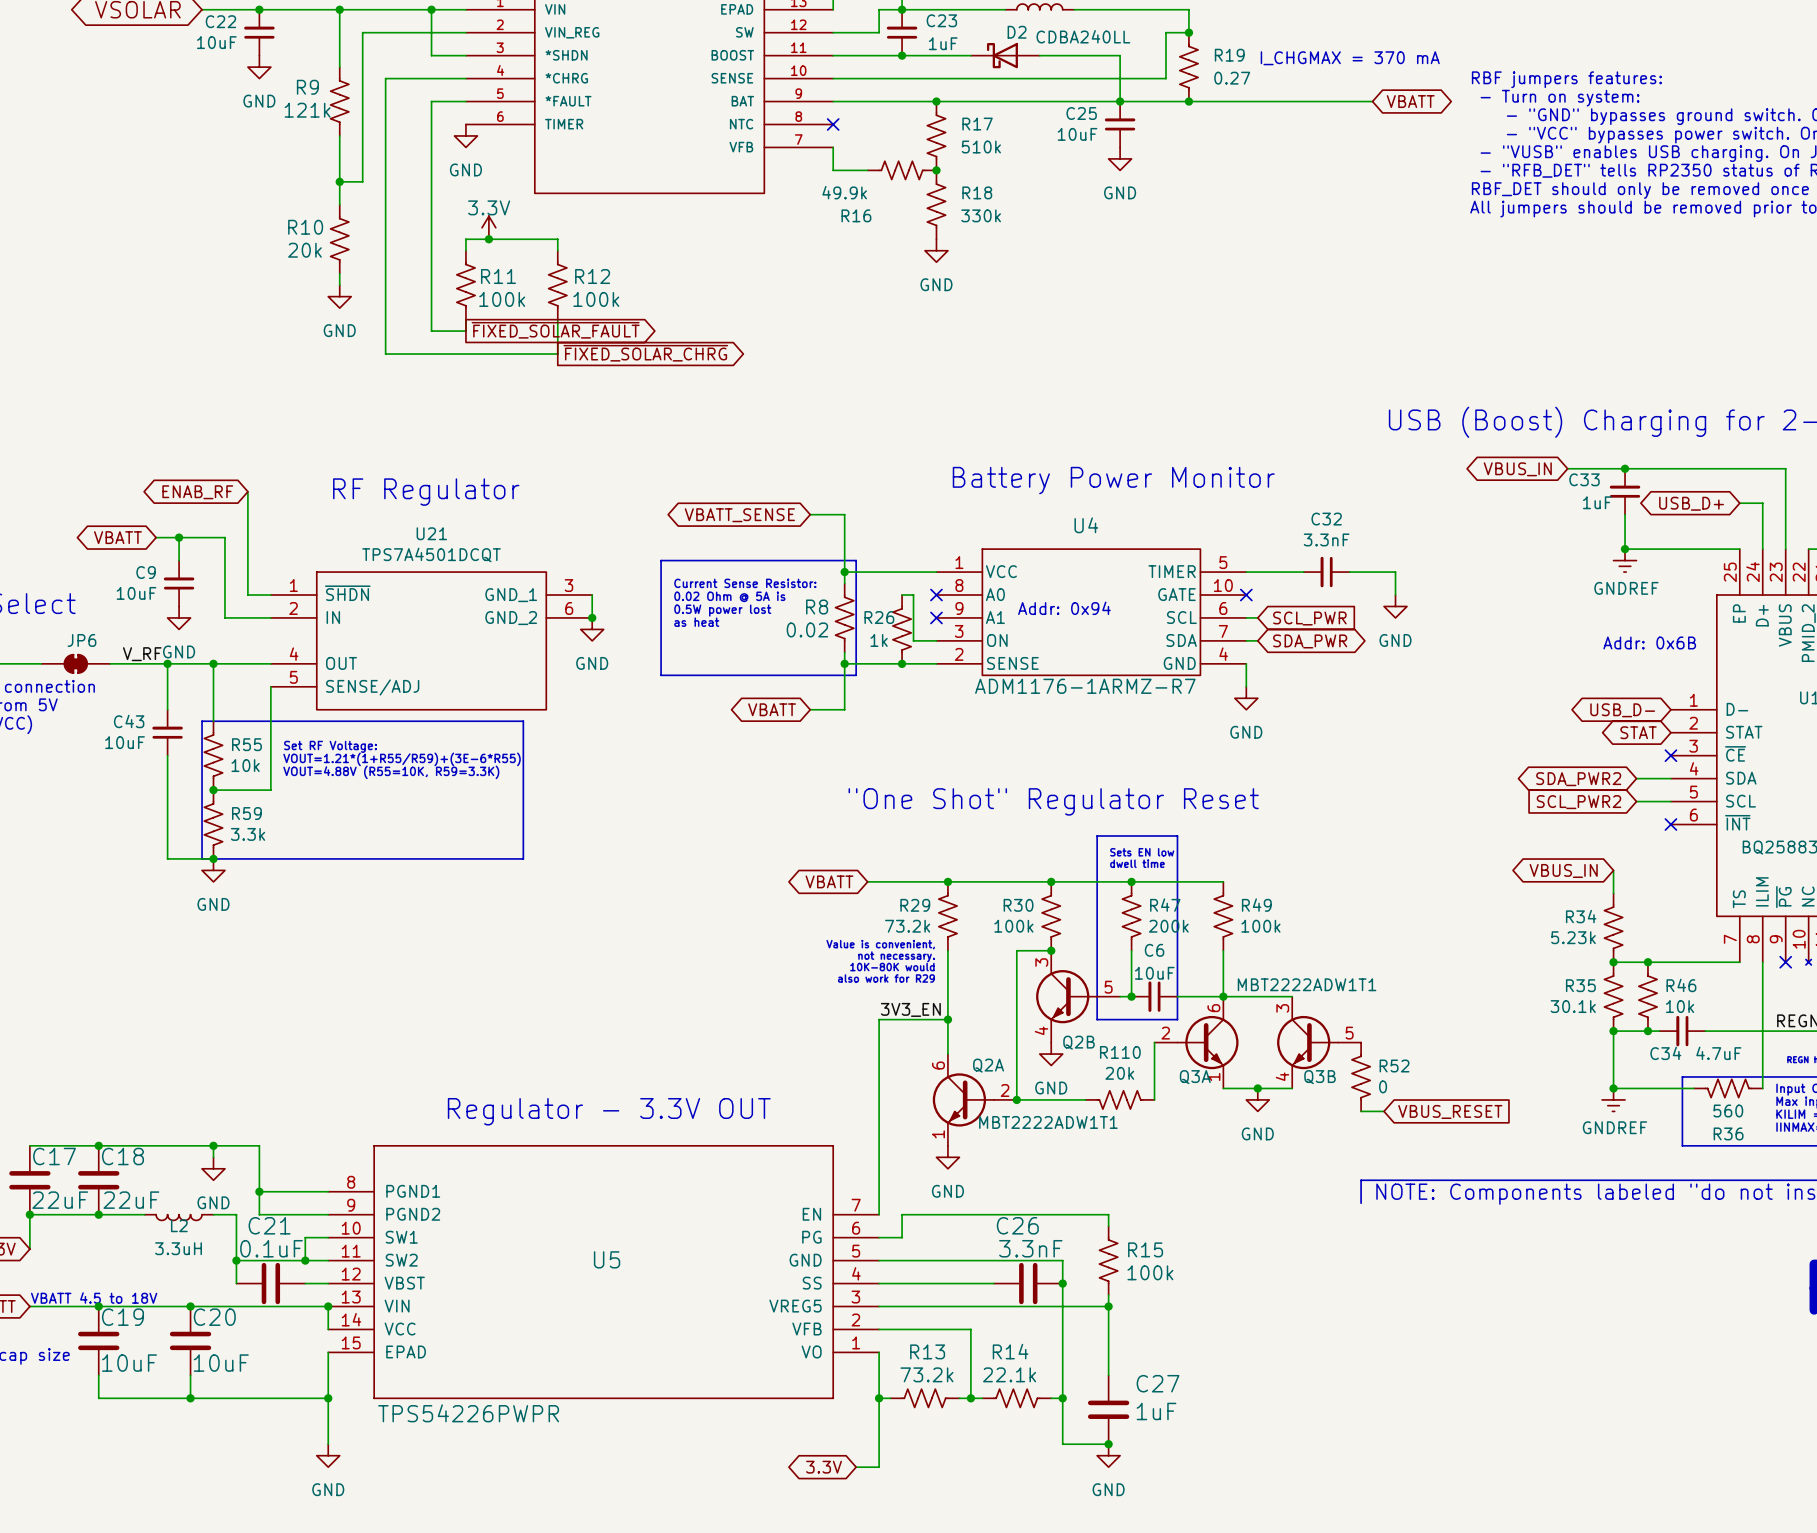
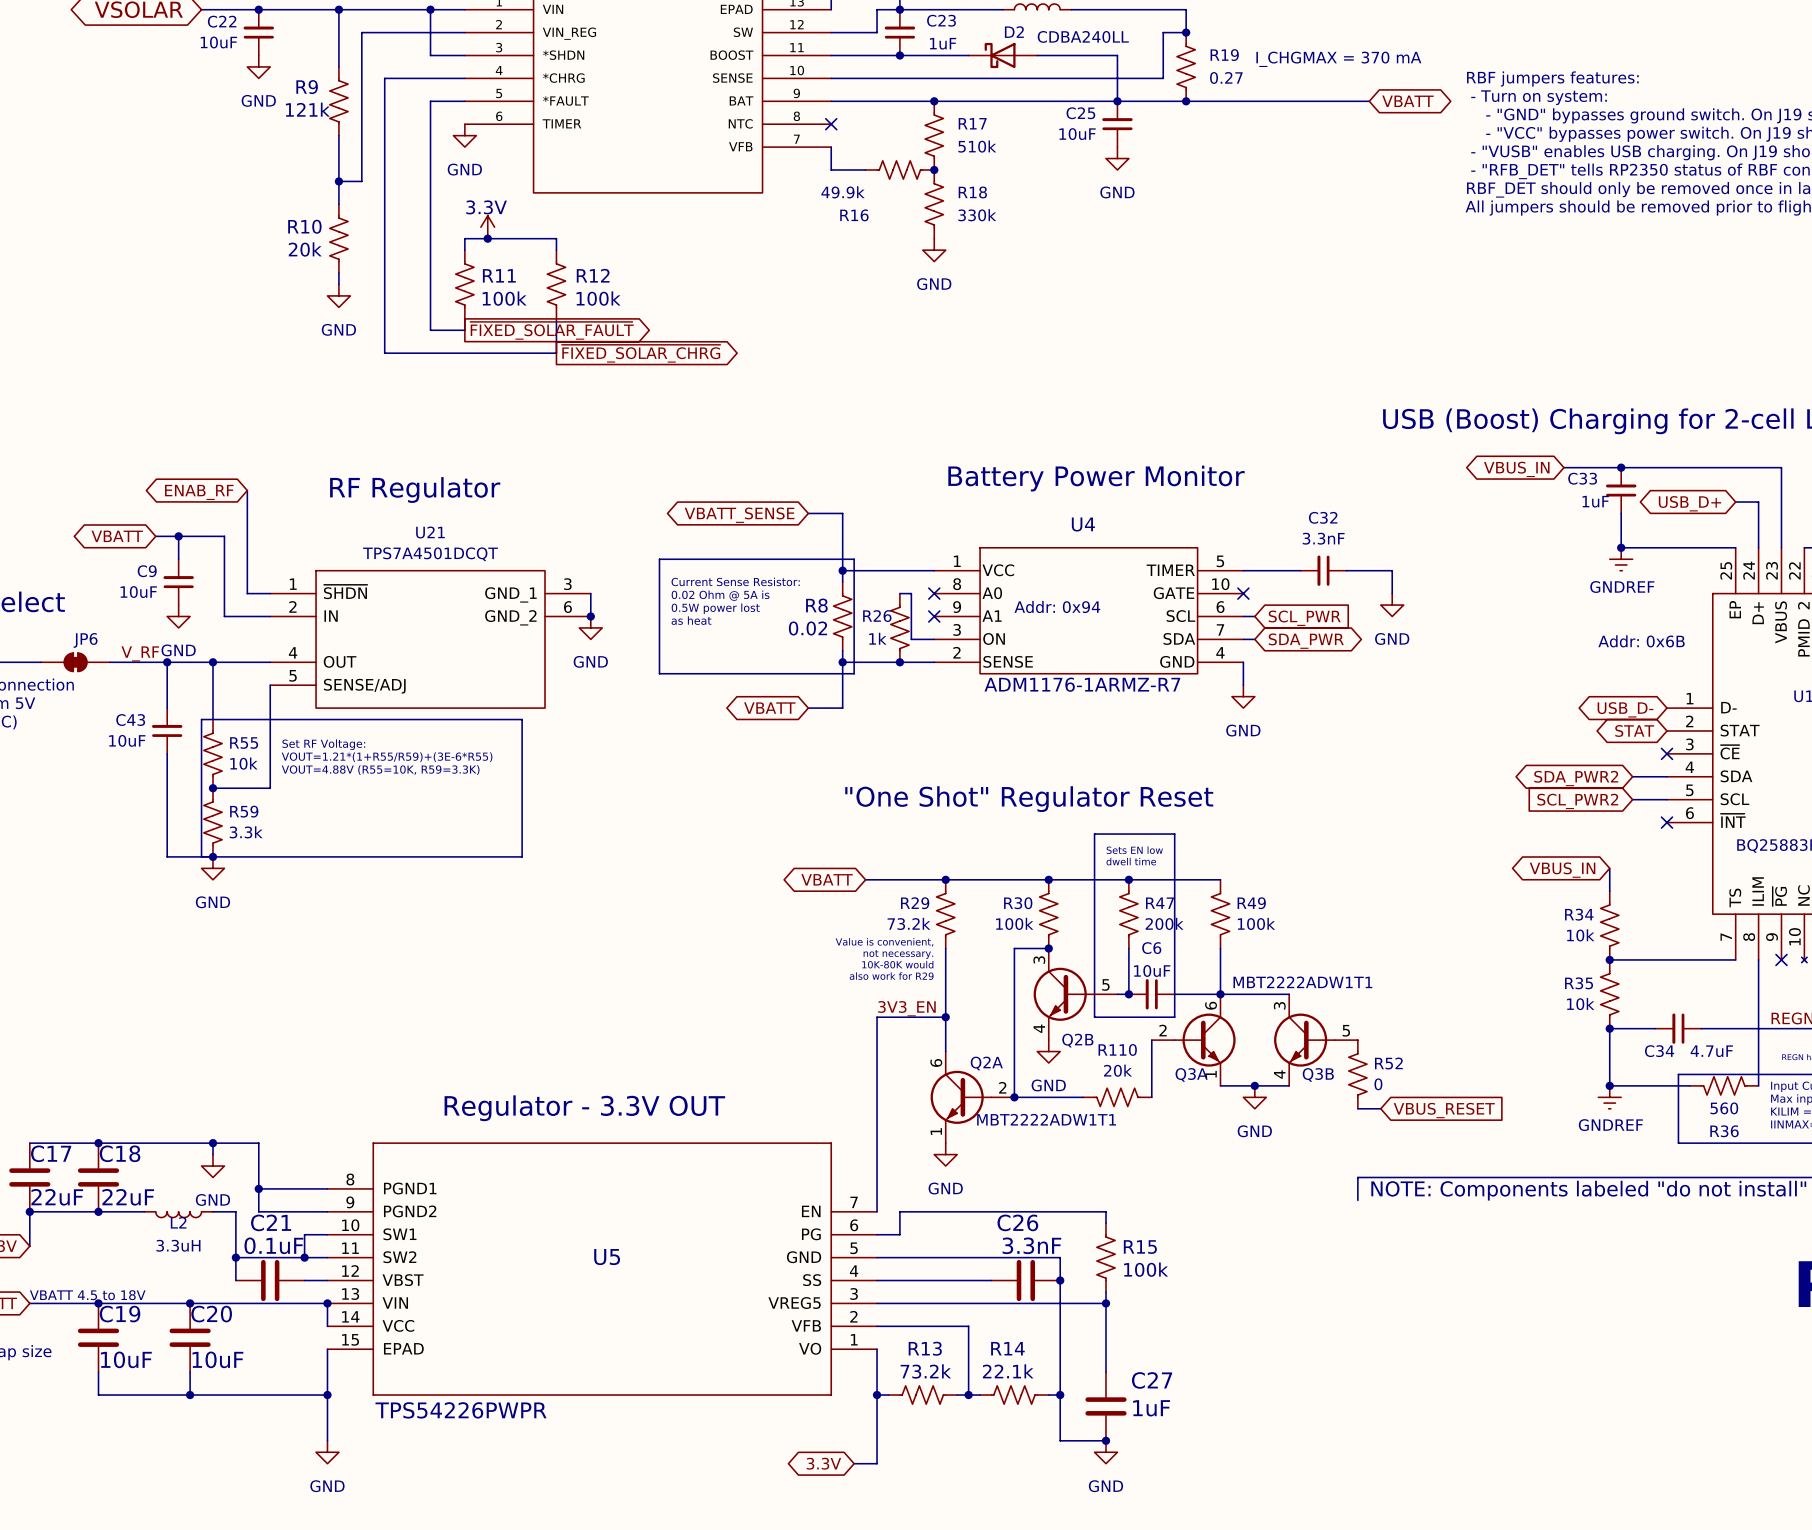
R34 value: 5.23k (1573, 937) -> 10k (1580, 935)
junction: (1647, 962) -> none
R46: 10k (1647, 996) -> none
R35 value: 30.1k (1573, 1006) -> 10k (1580, 1004)
junction: (1647, 1031) -> none

